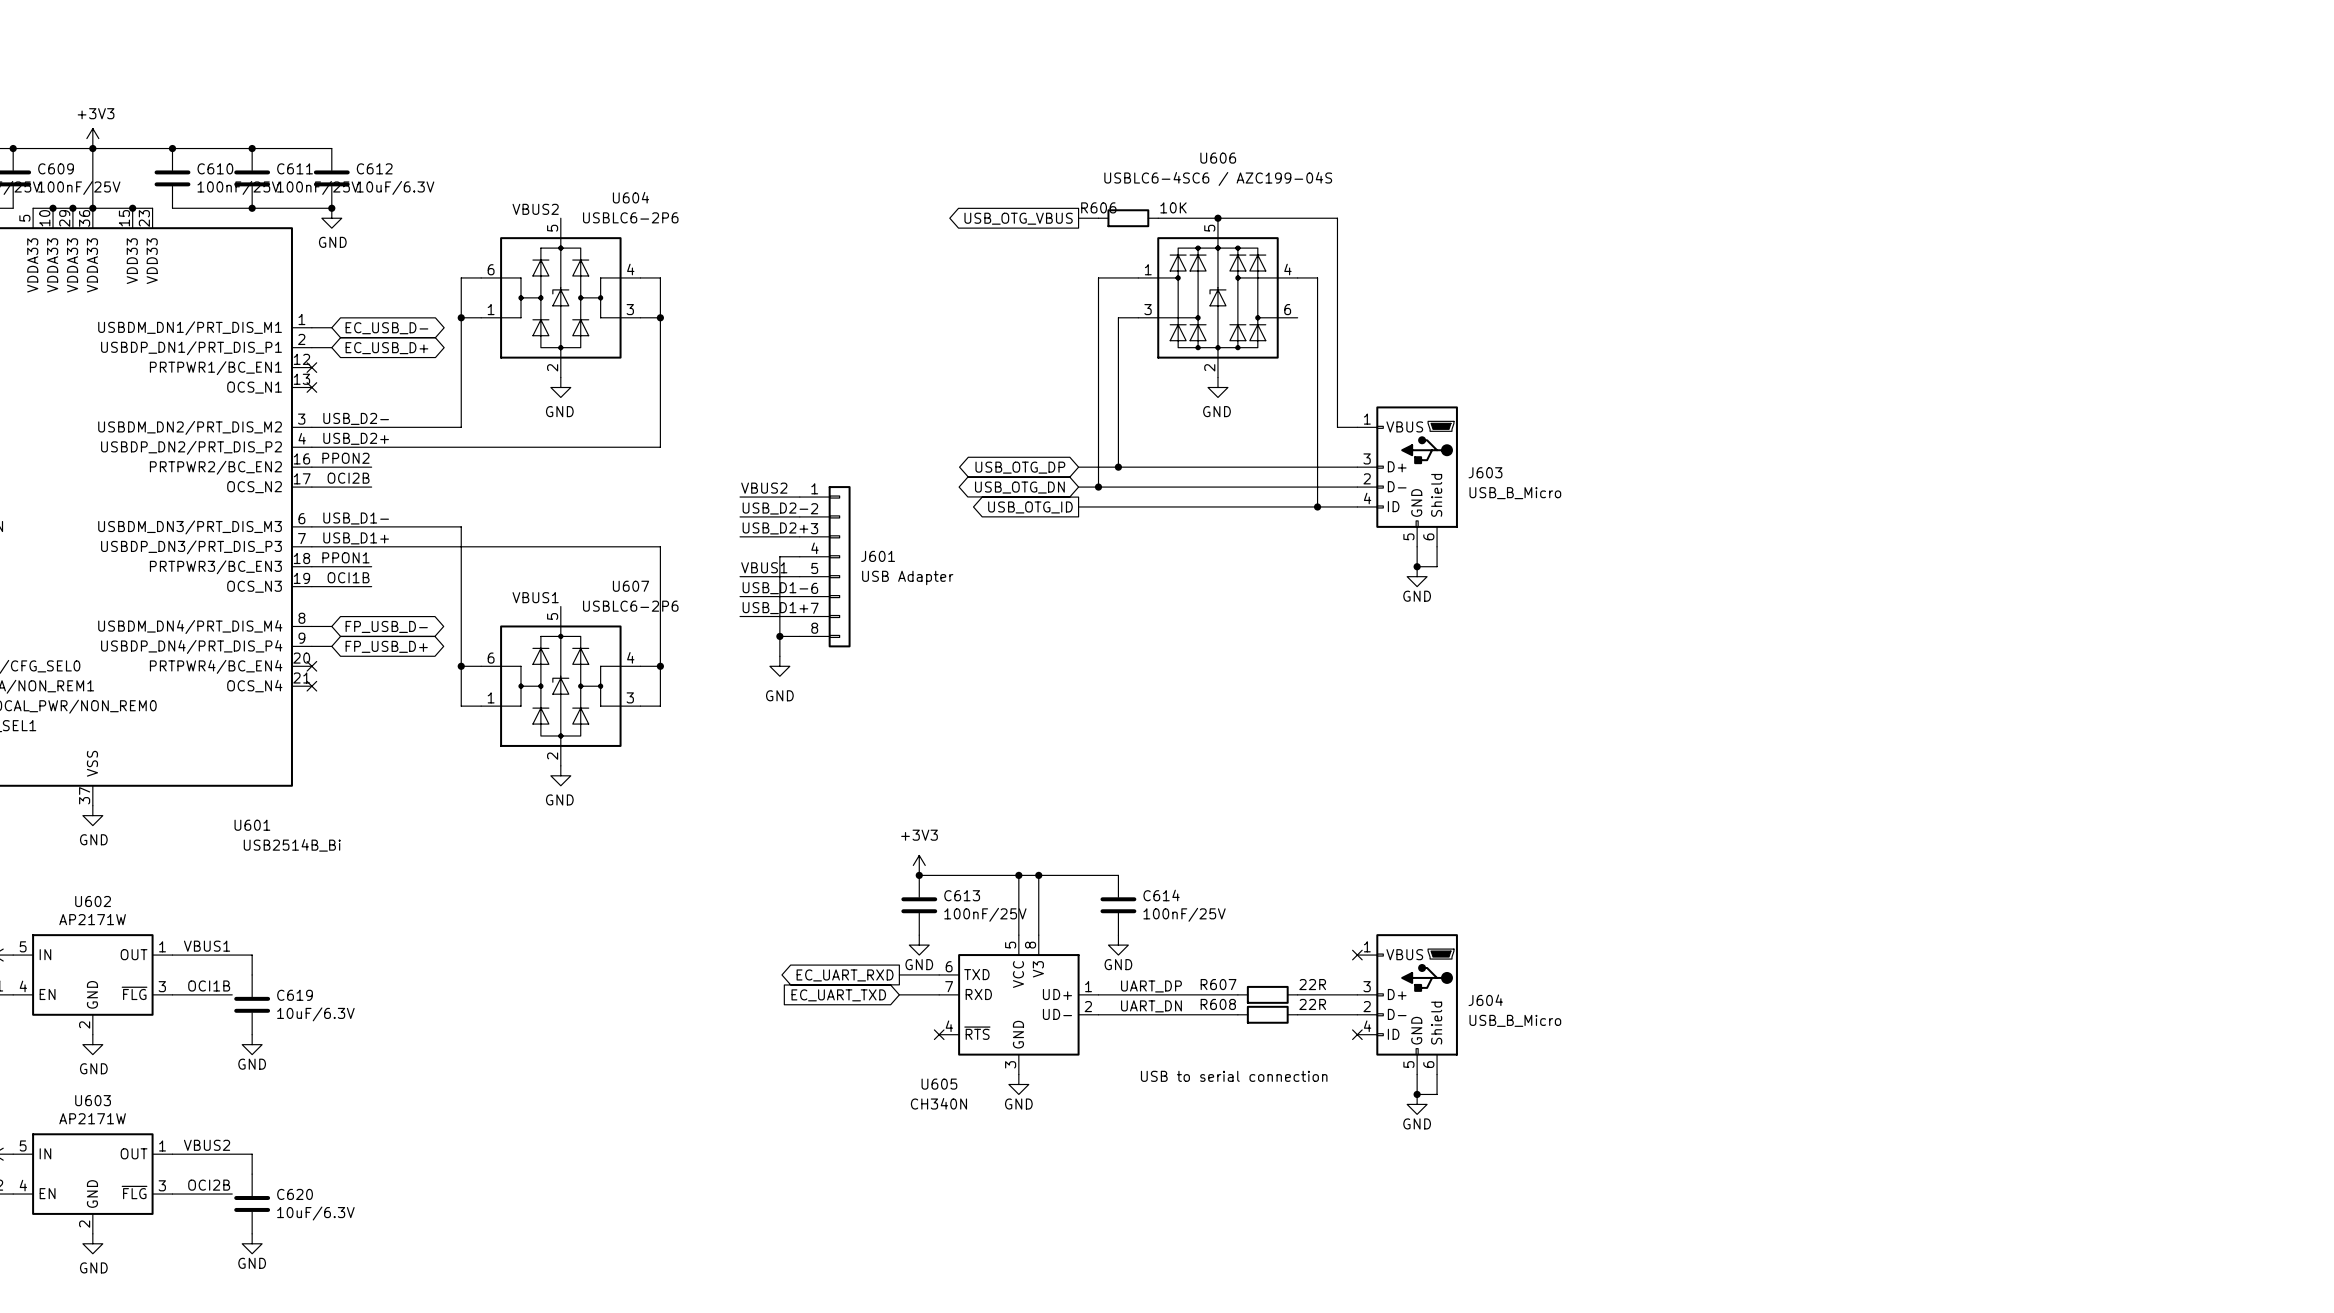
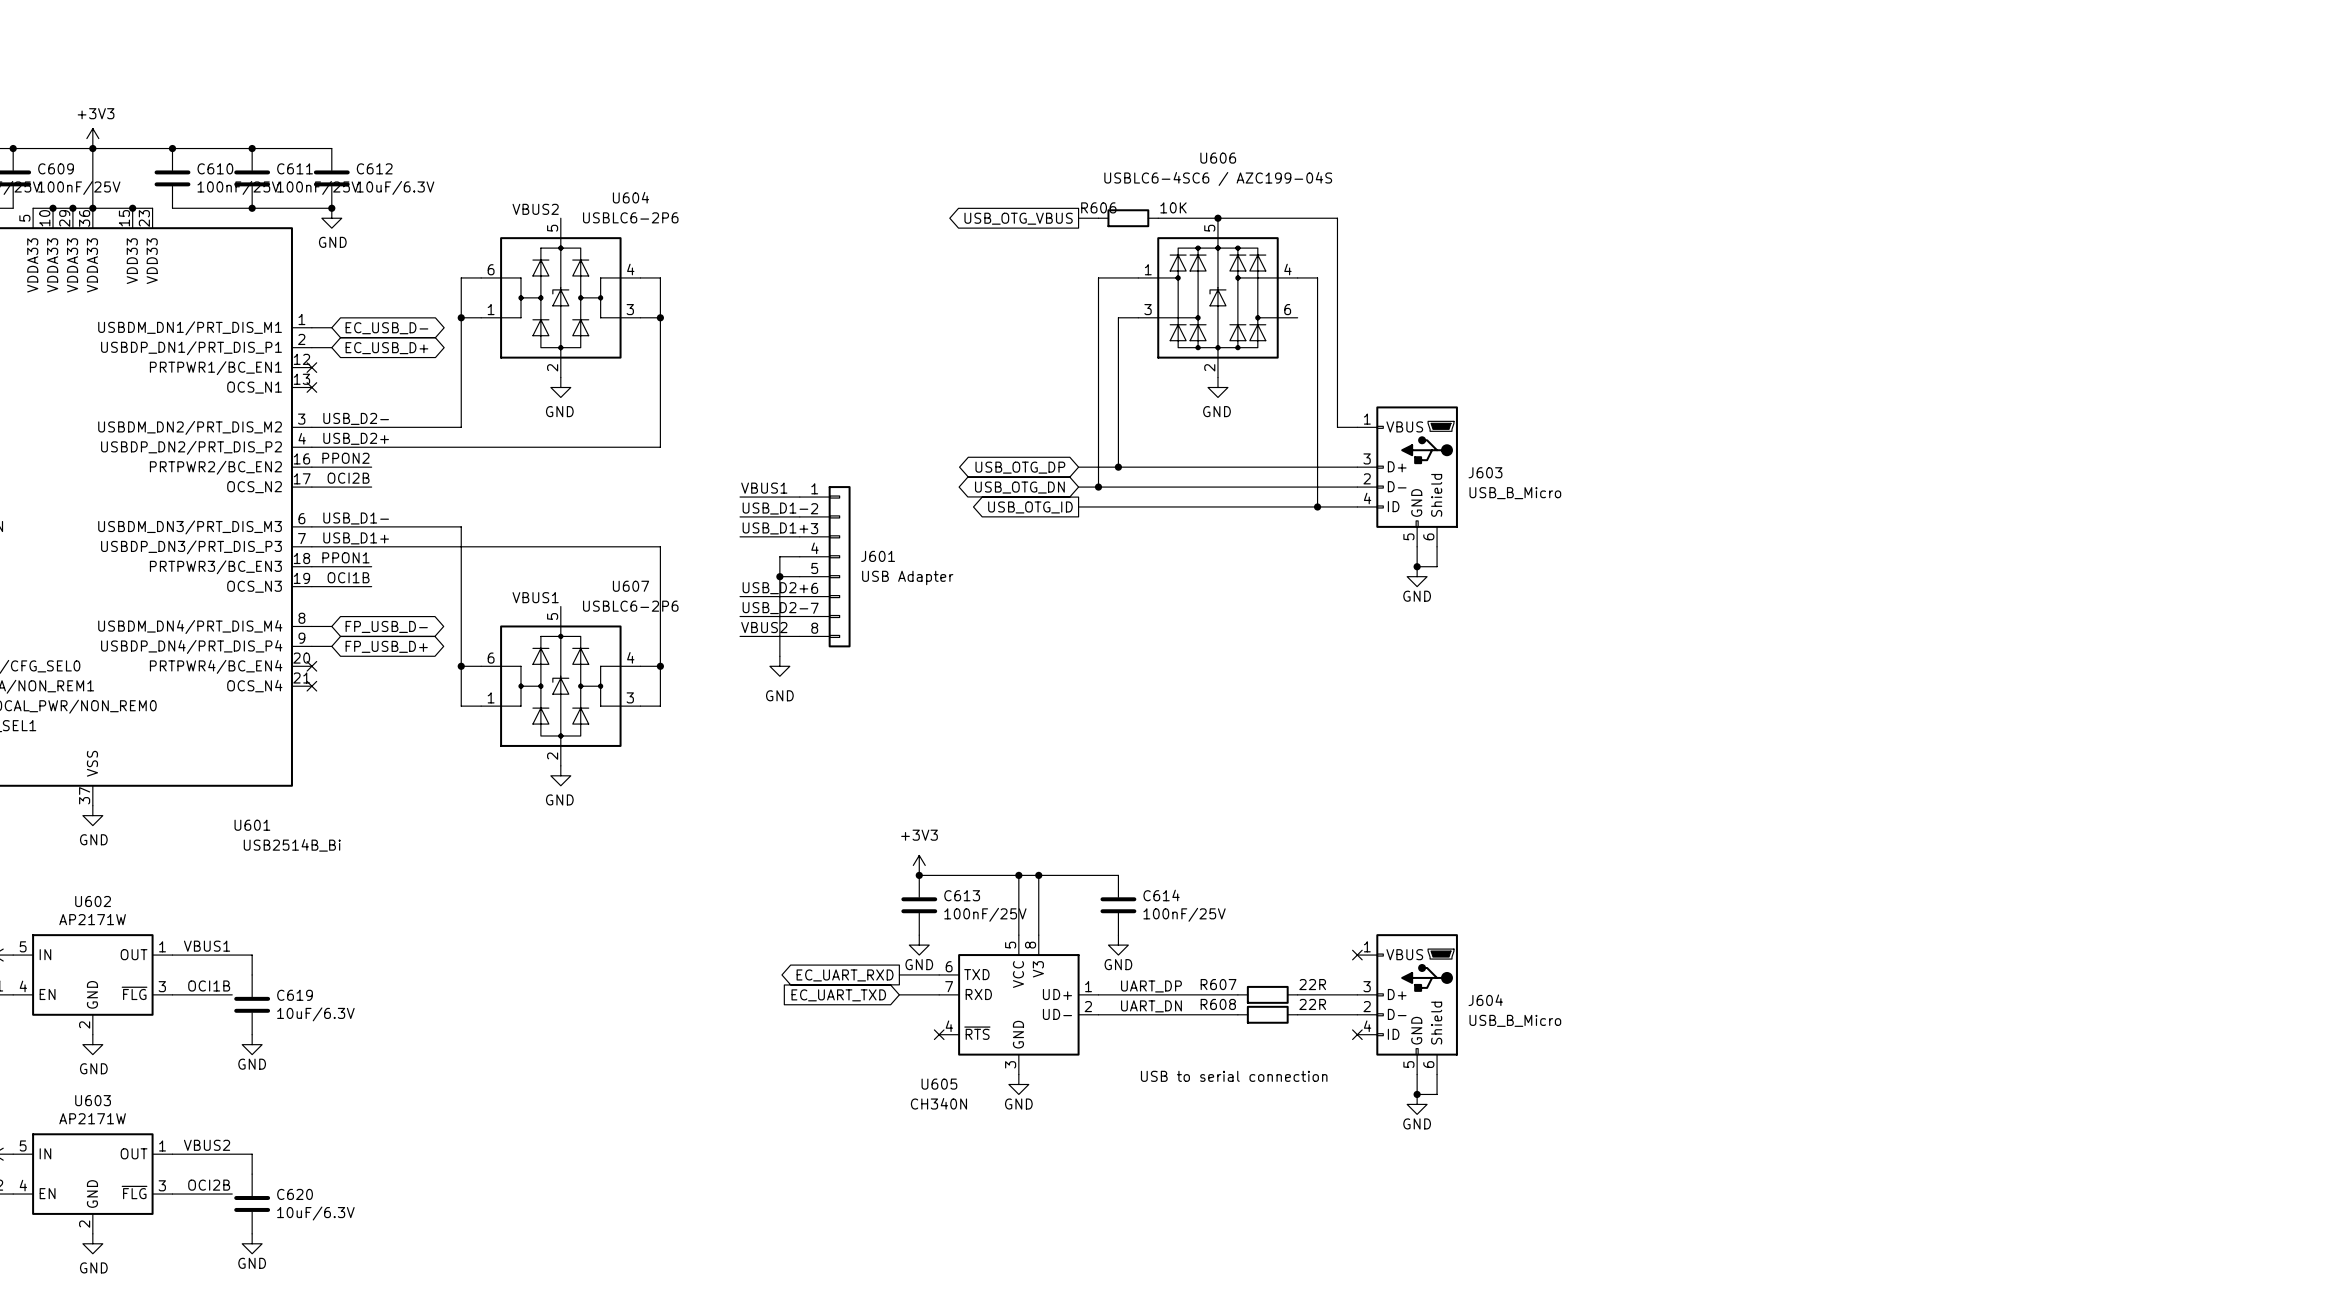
label: VBUS2 (764, 488) -> VBUS1 (764, 488)
label: USB_D2- (775, 508) -> USB_D1- (775, 508)
label: USB_D2+ (775, 528) -> USB_D1+ (775, 528)
label: VBUS1 (764, 567) -> none
wire: (740, 576) (779, 576) -> (740, 636) (779, 636)
junction: none -> (779, 576)
label: USB_D1- (775, 588) -> USB_D2+ (775, 588)
label: USB_D1+ (775, 608) -> USB_D2- (775, 608)
label: none -> VBUS2 (764, 627)
junction: (779, 636) -> none

